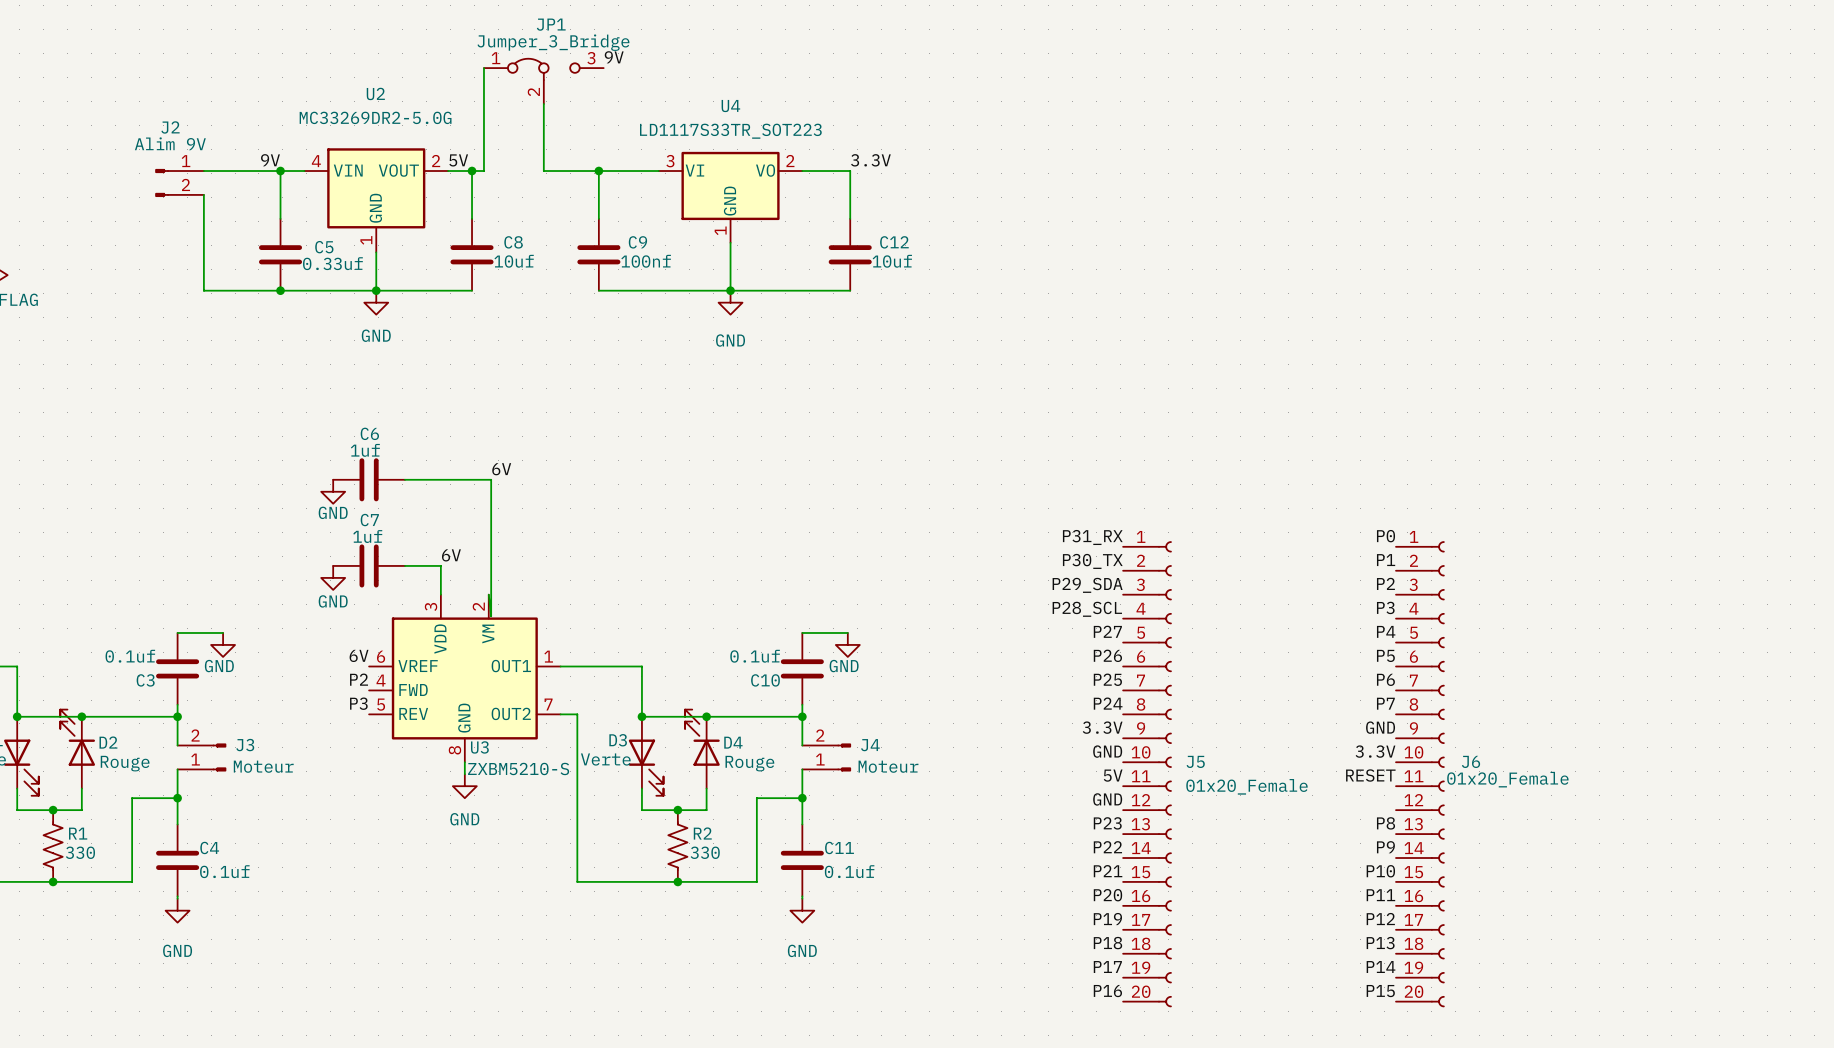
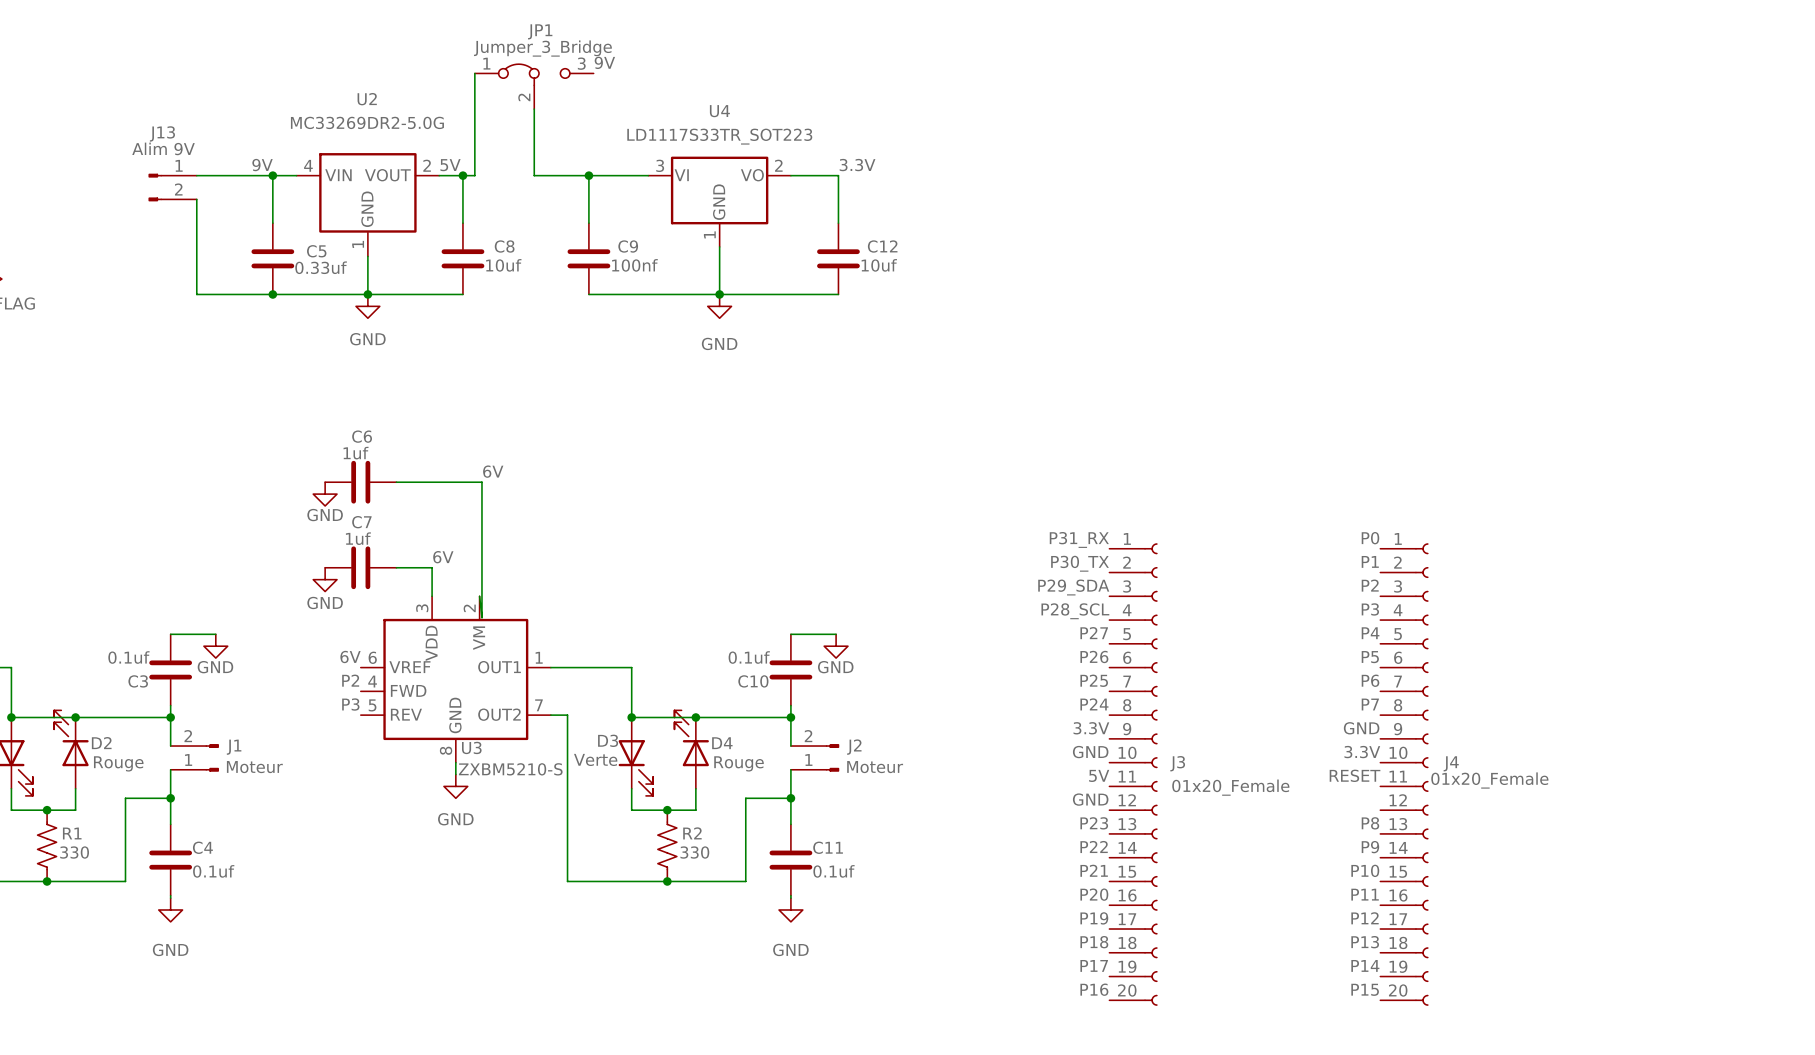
J2 name: J2 (170, 127) -> J13 (162, 133)
J3 name: J3 (245, 745) -> J1 (234, 747)
J4 name: J4 (870, 745) -> J2 (854, 747)
J5 name: J5 (1195, 761) -> J3 (1177, 763)
J6 name: J6 (1470, 761) -> J4 (1451, 763)

